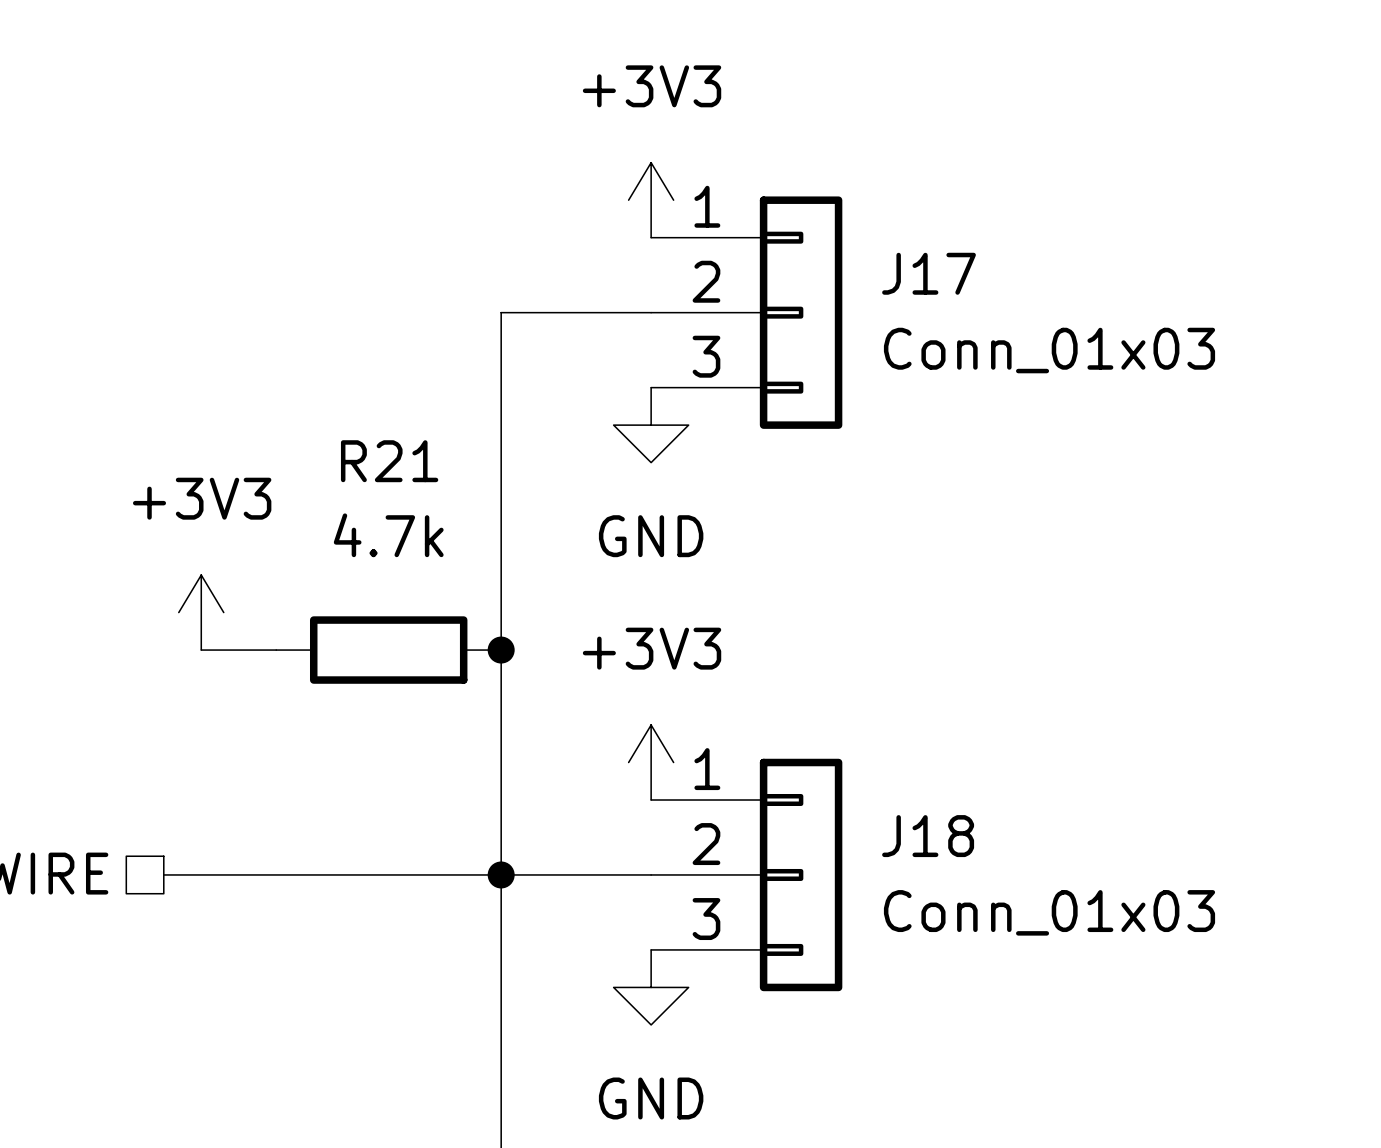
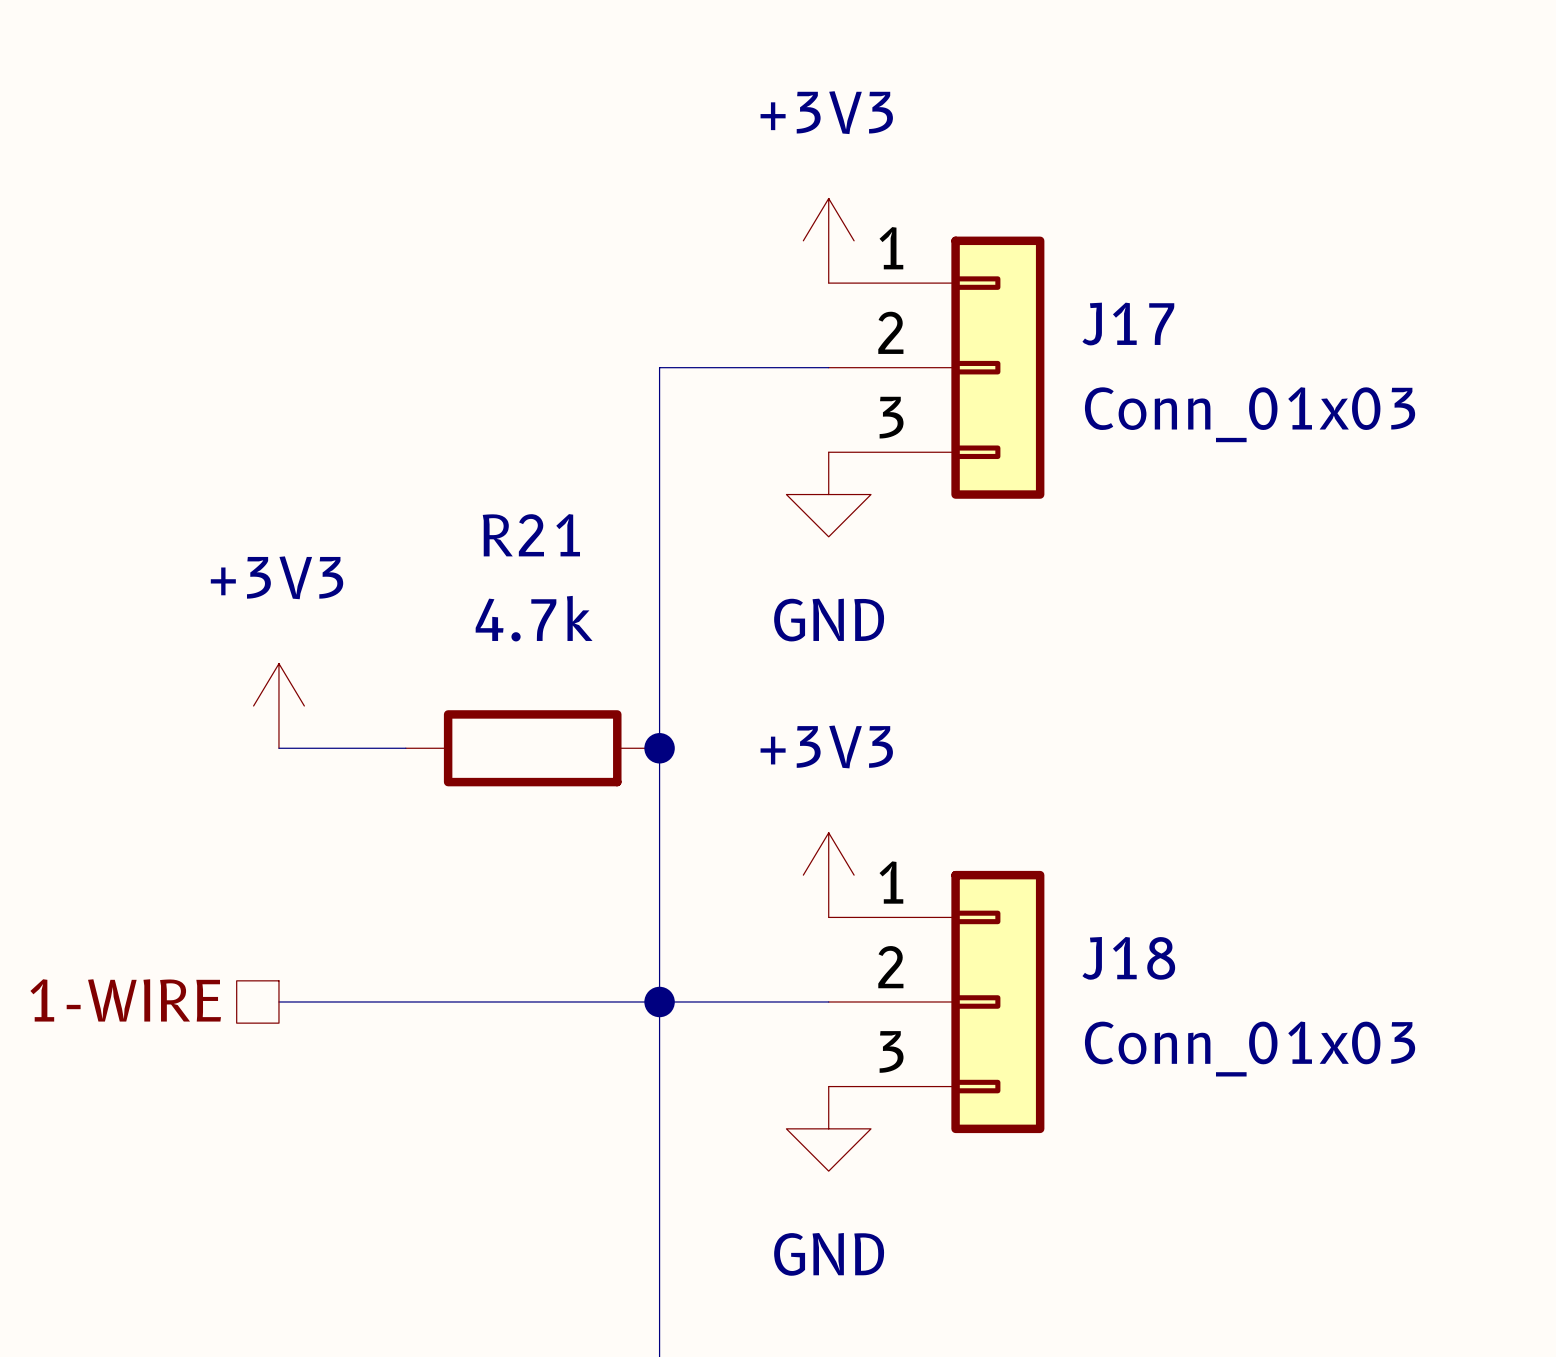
power symbol position: +3V3 (201, 612) -> +3V3 (278, 705)
wire: none -> (278, 748) (321, 748)

